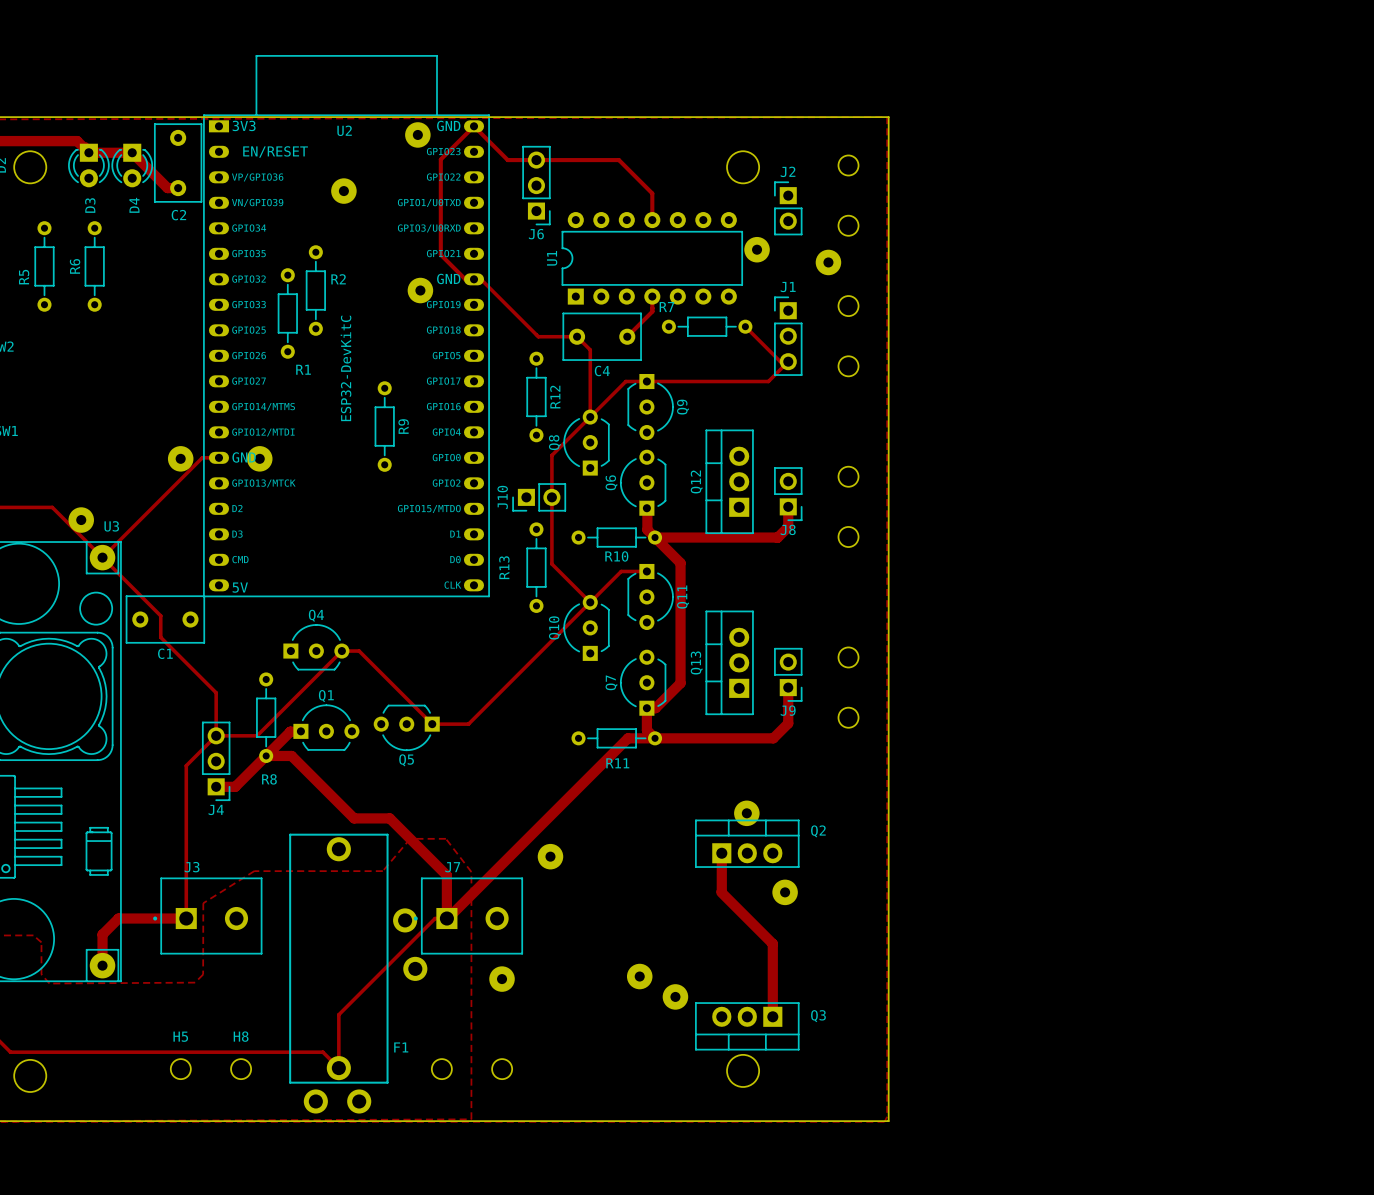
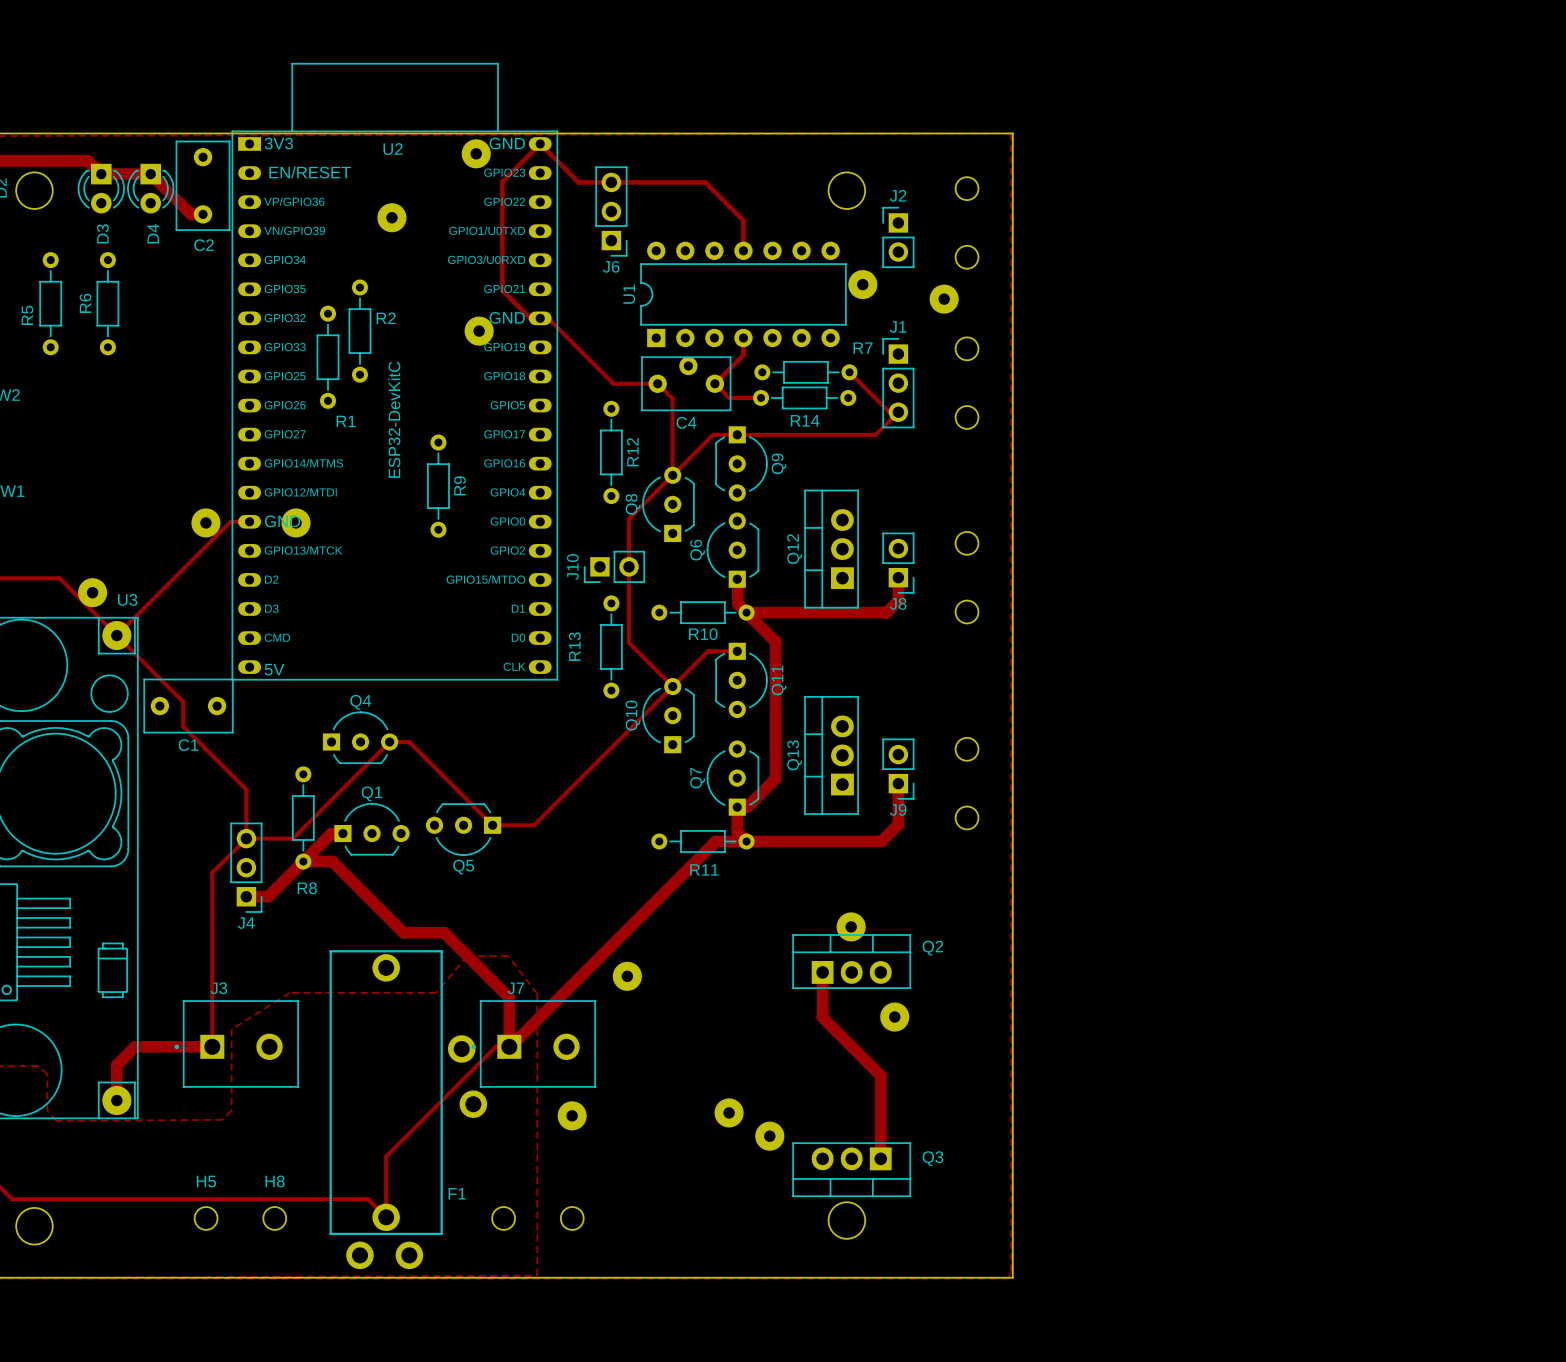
R7 name position: R7 (666, 307) -> R7 (863, 348)
part: none -> (688, 365)
track: none -> (714, 383) (729, 397) (761, 397)
R14: none -> (804, 397)

